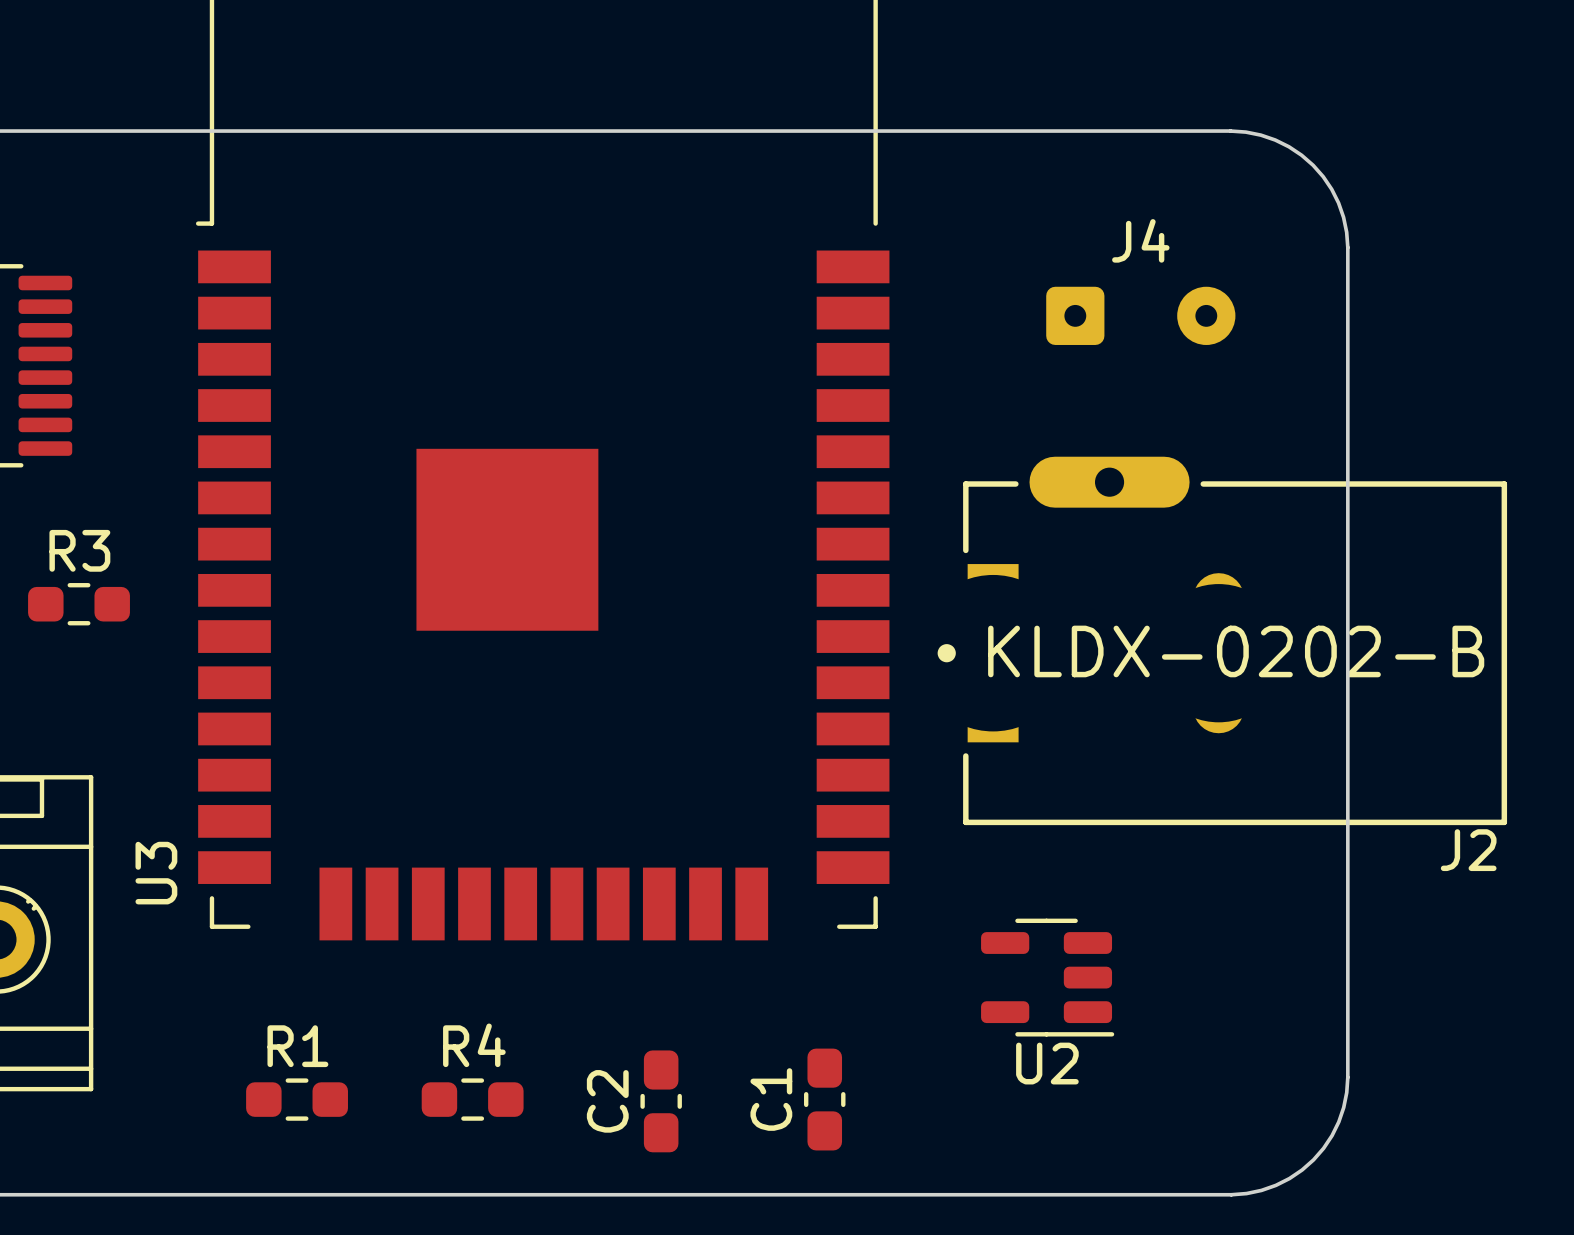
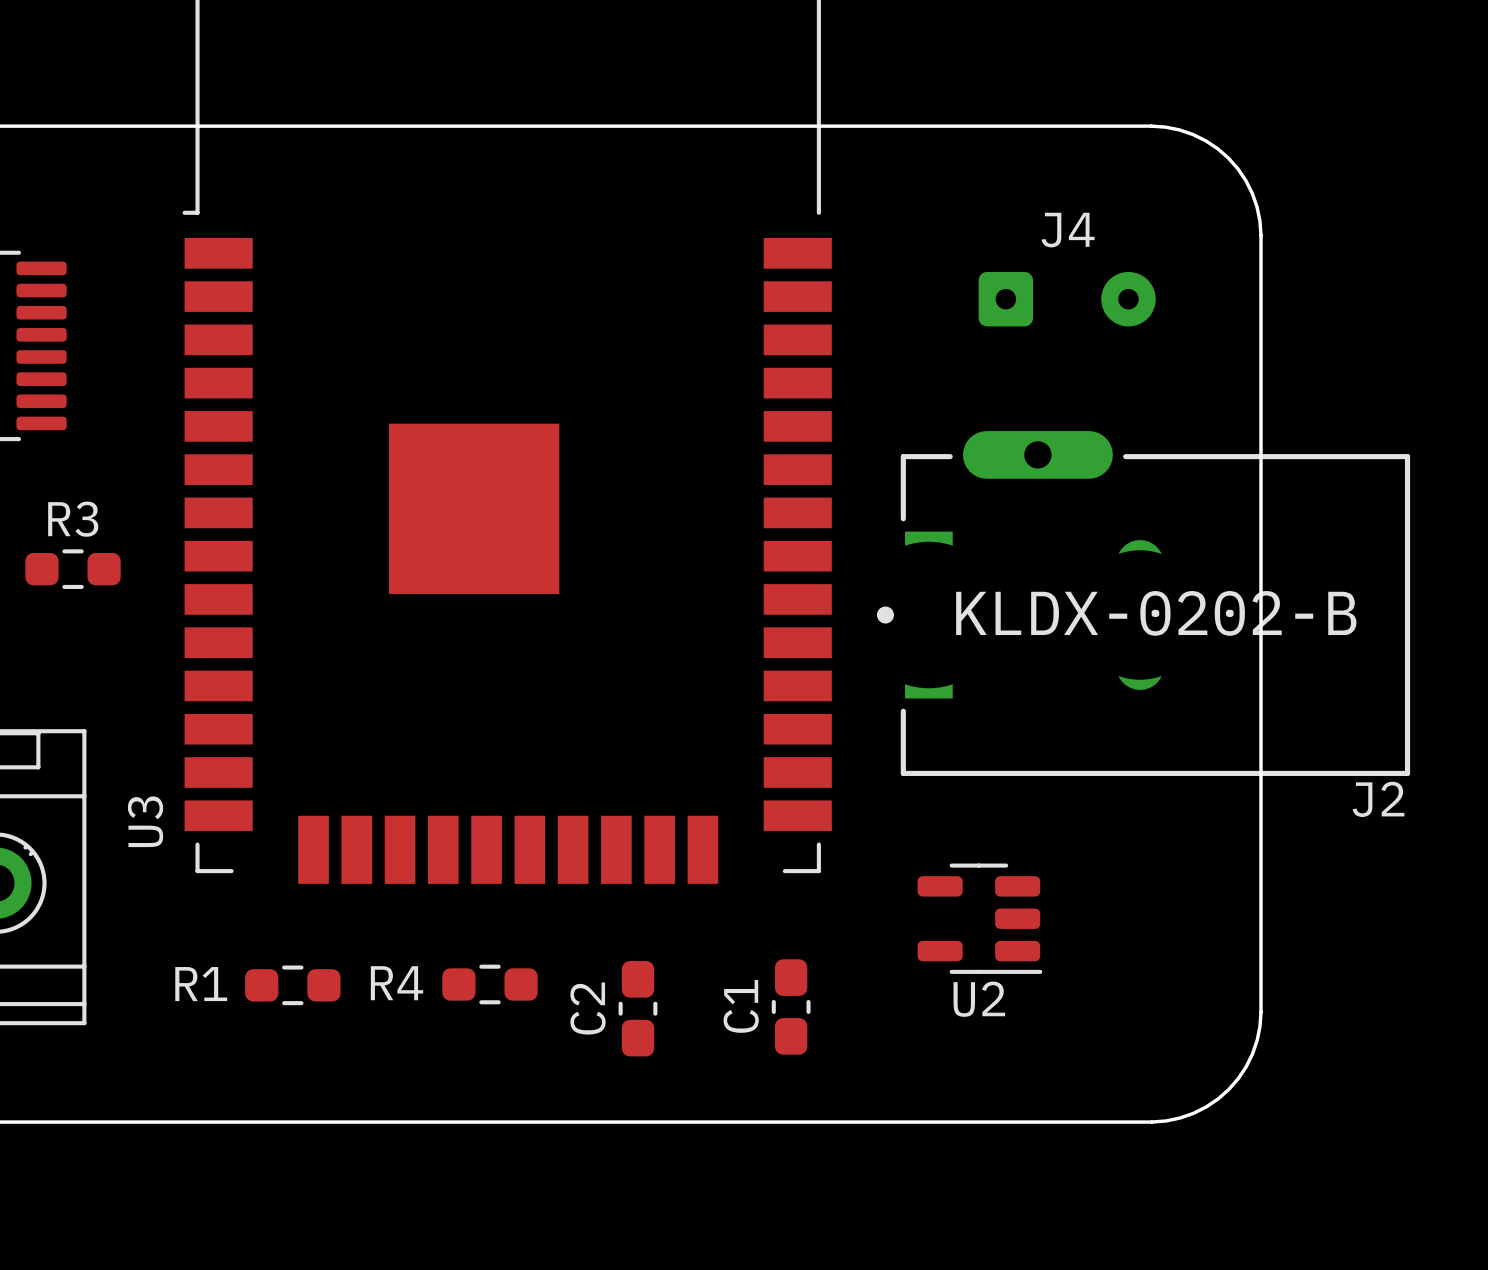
R4 name position: R4 (474, 1045) -> R4 (396, 983)
R1 name position: R1 (297, 1046) -> R1 (201, 984)
R1 position: (297, 1099) -> (292, 985)
R4 position: (472, 1099) -> (489, 984)
C1 position: (824, 1099) -> (791, 1006)
C2 position: (661, 1101) -> (638, 1008)

